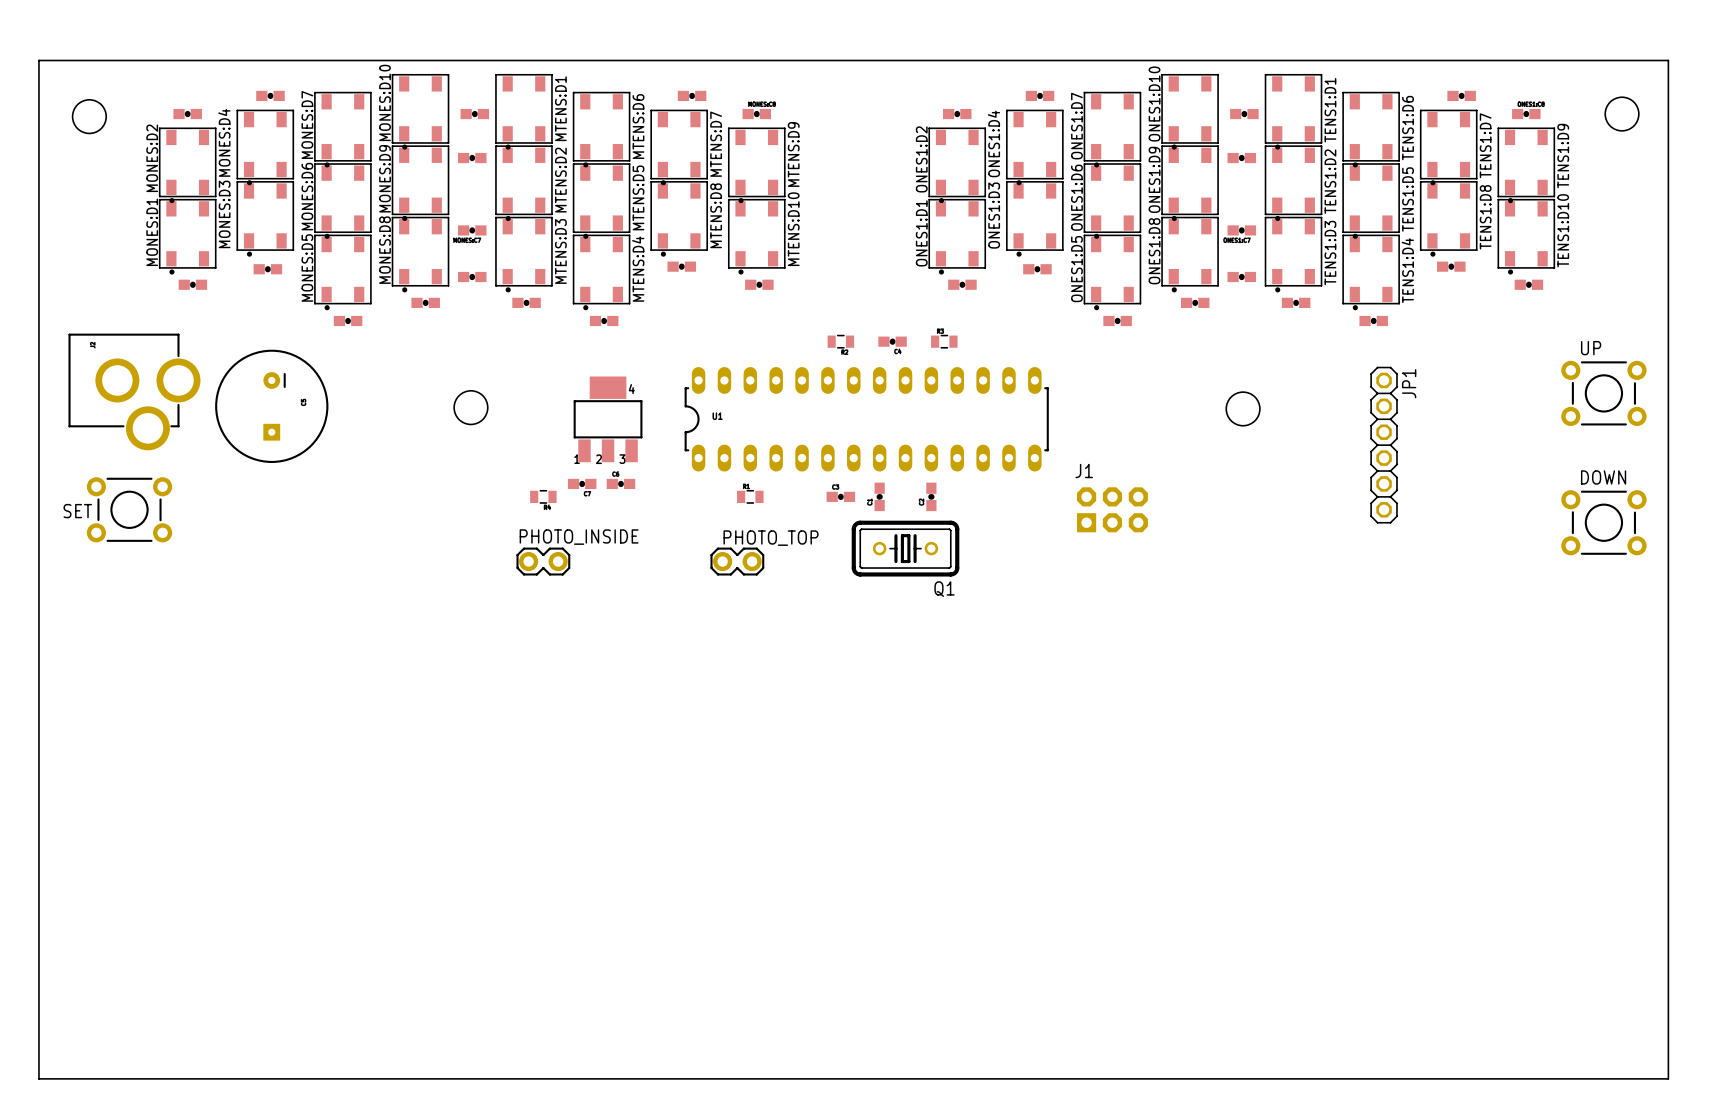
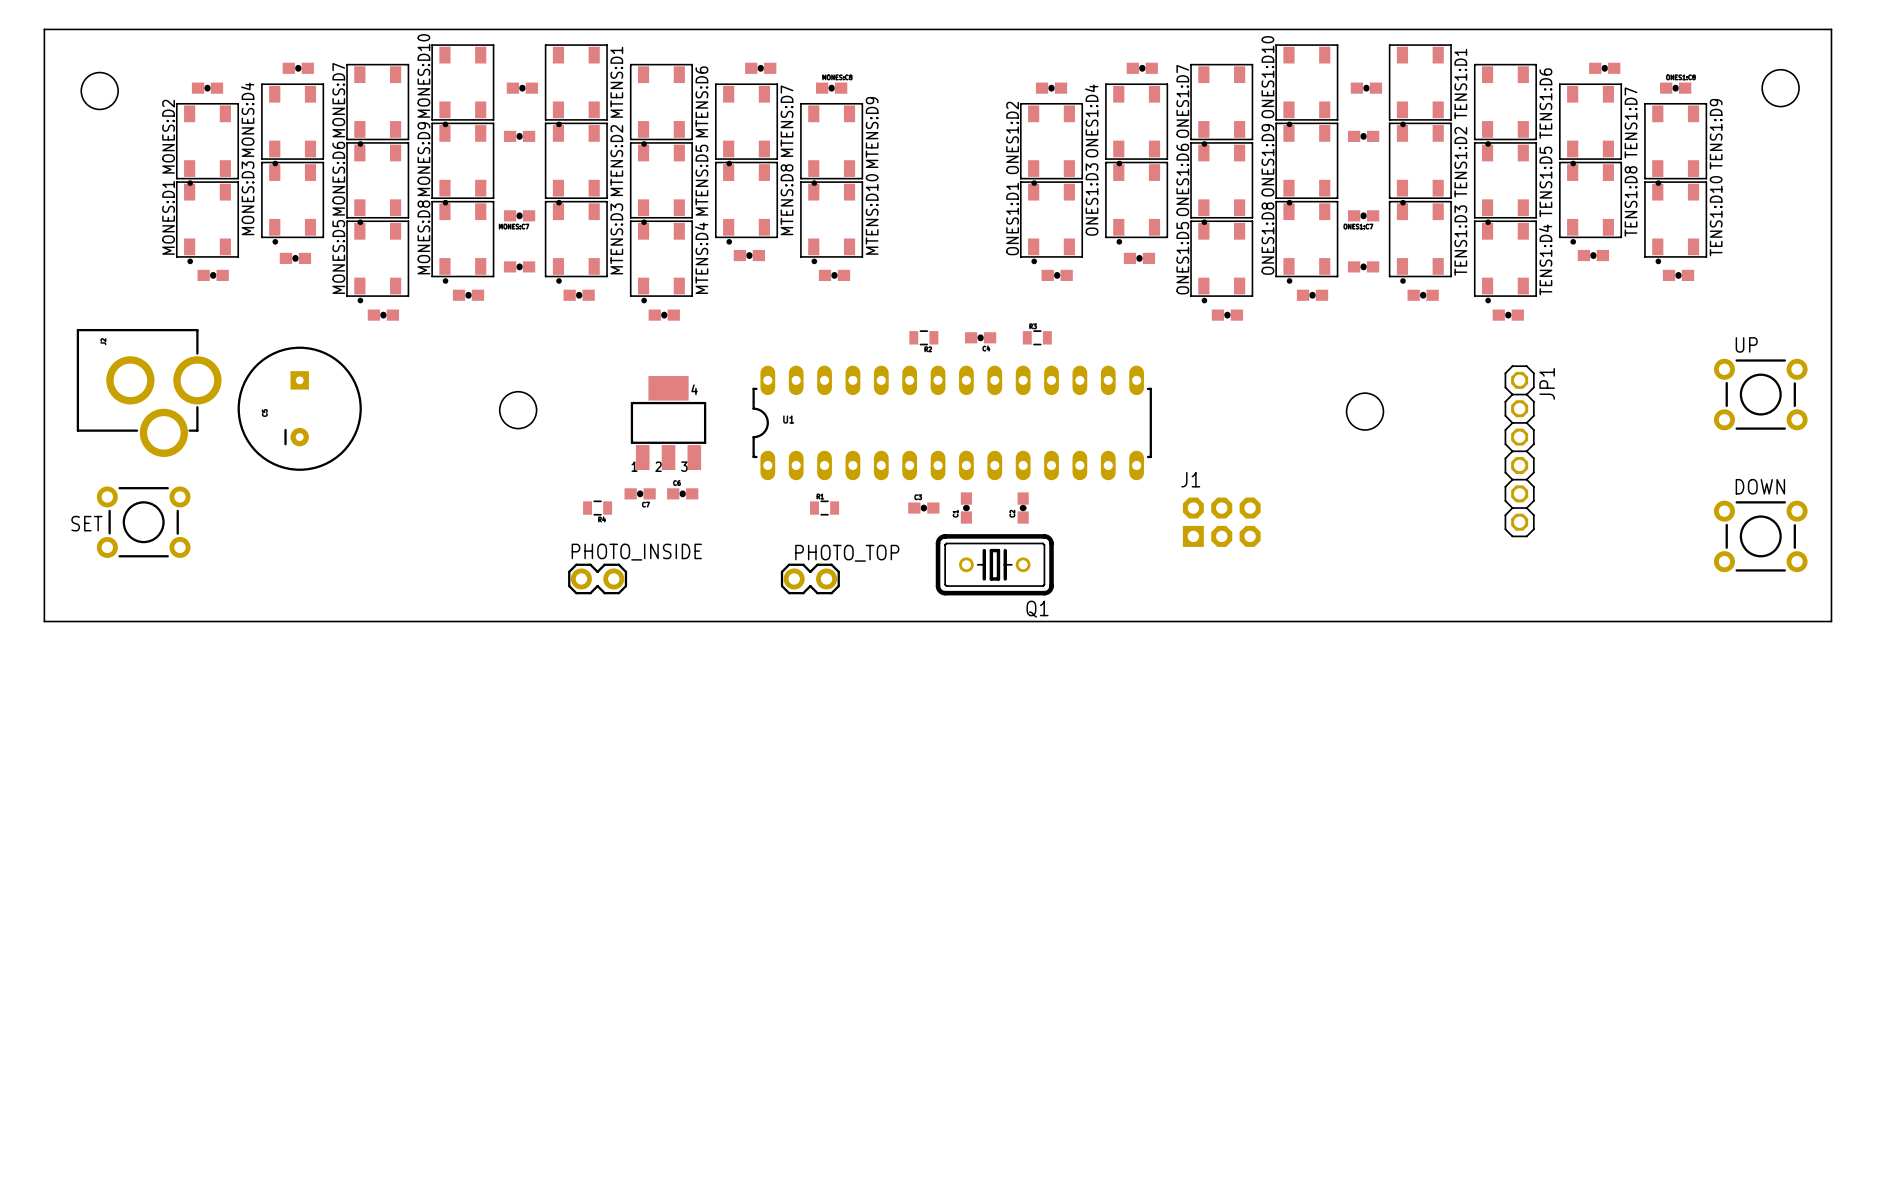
part rotation: 0° (271, 406) -> 180° (299, 408)
board edge: (38, 600) (38, 1078) (1668, 1078) (1668, 600) -> (44, 621) (1831, 621)

